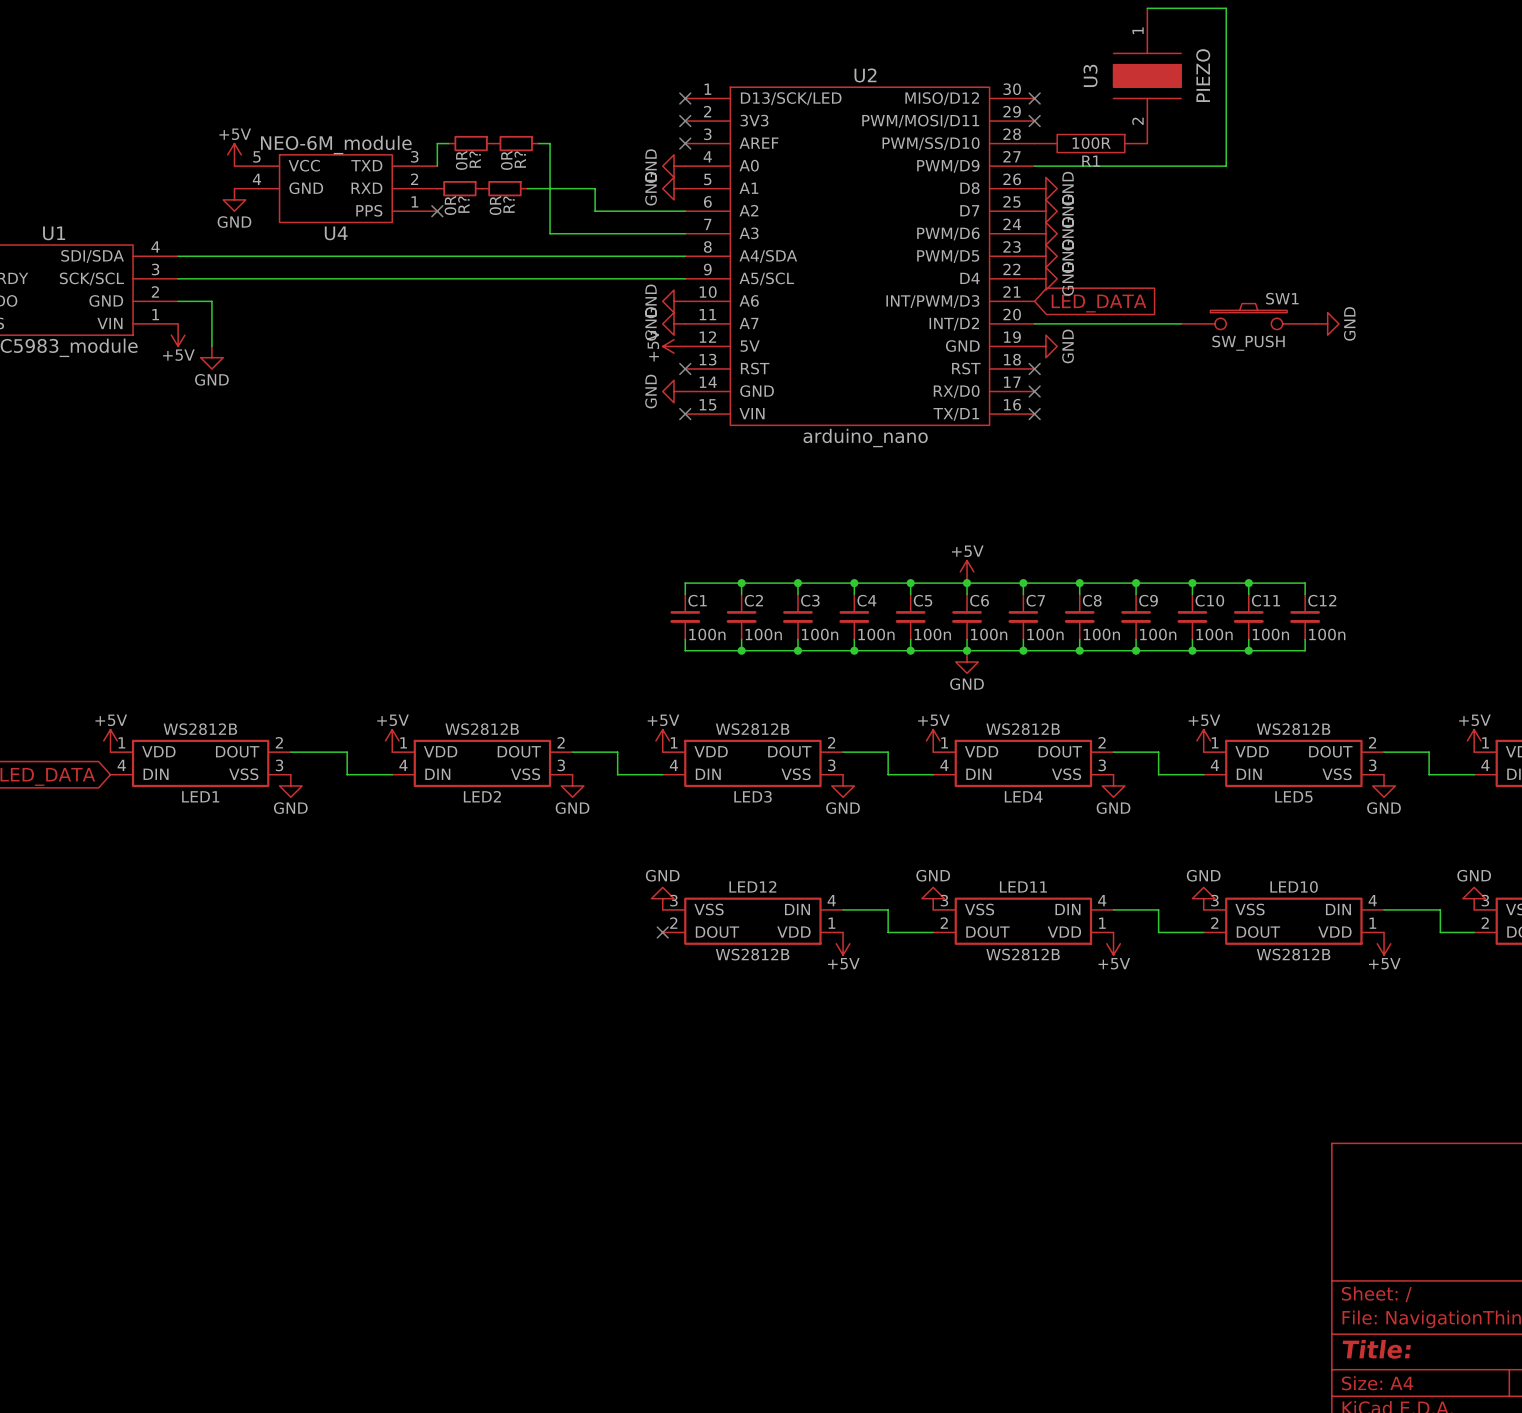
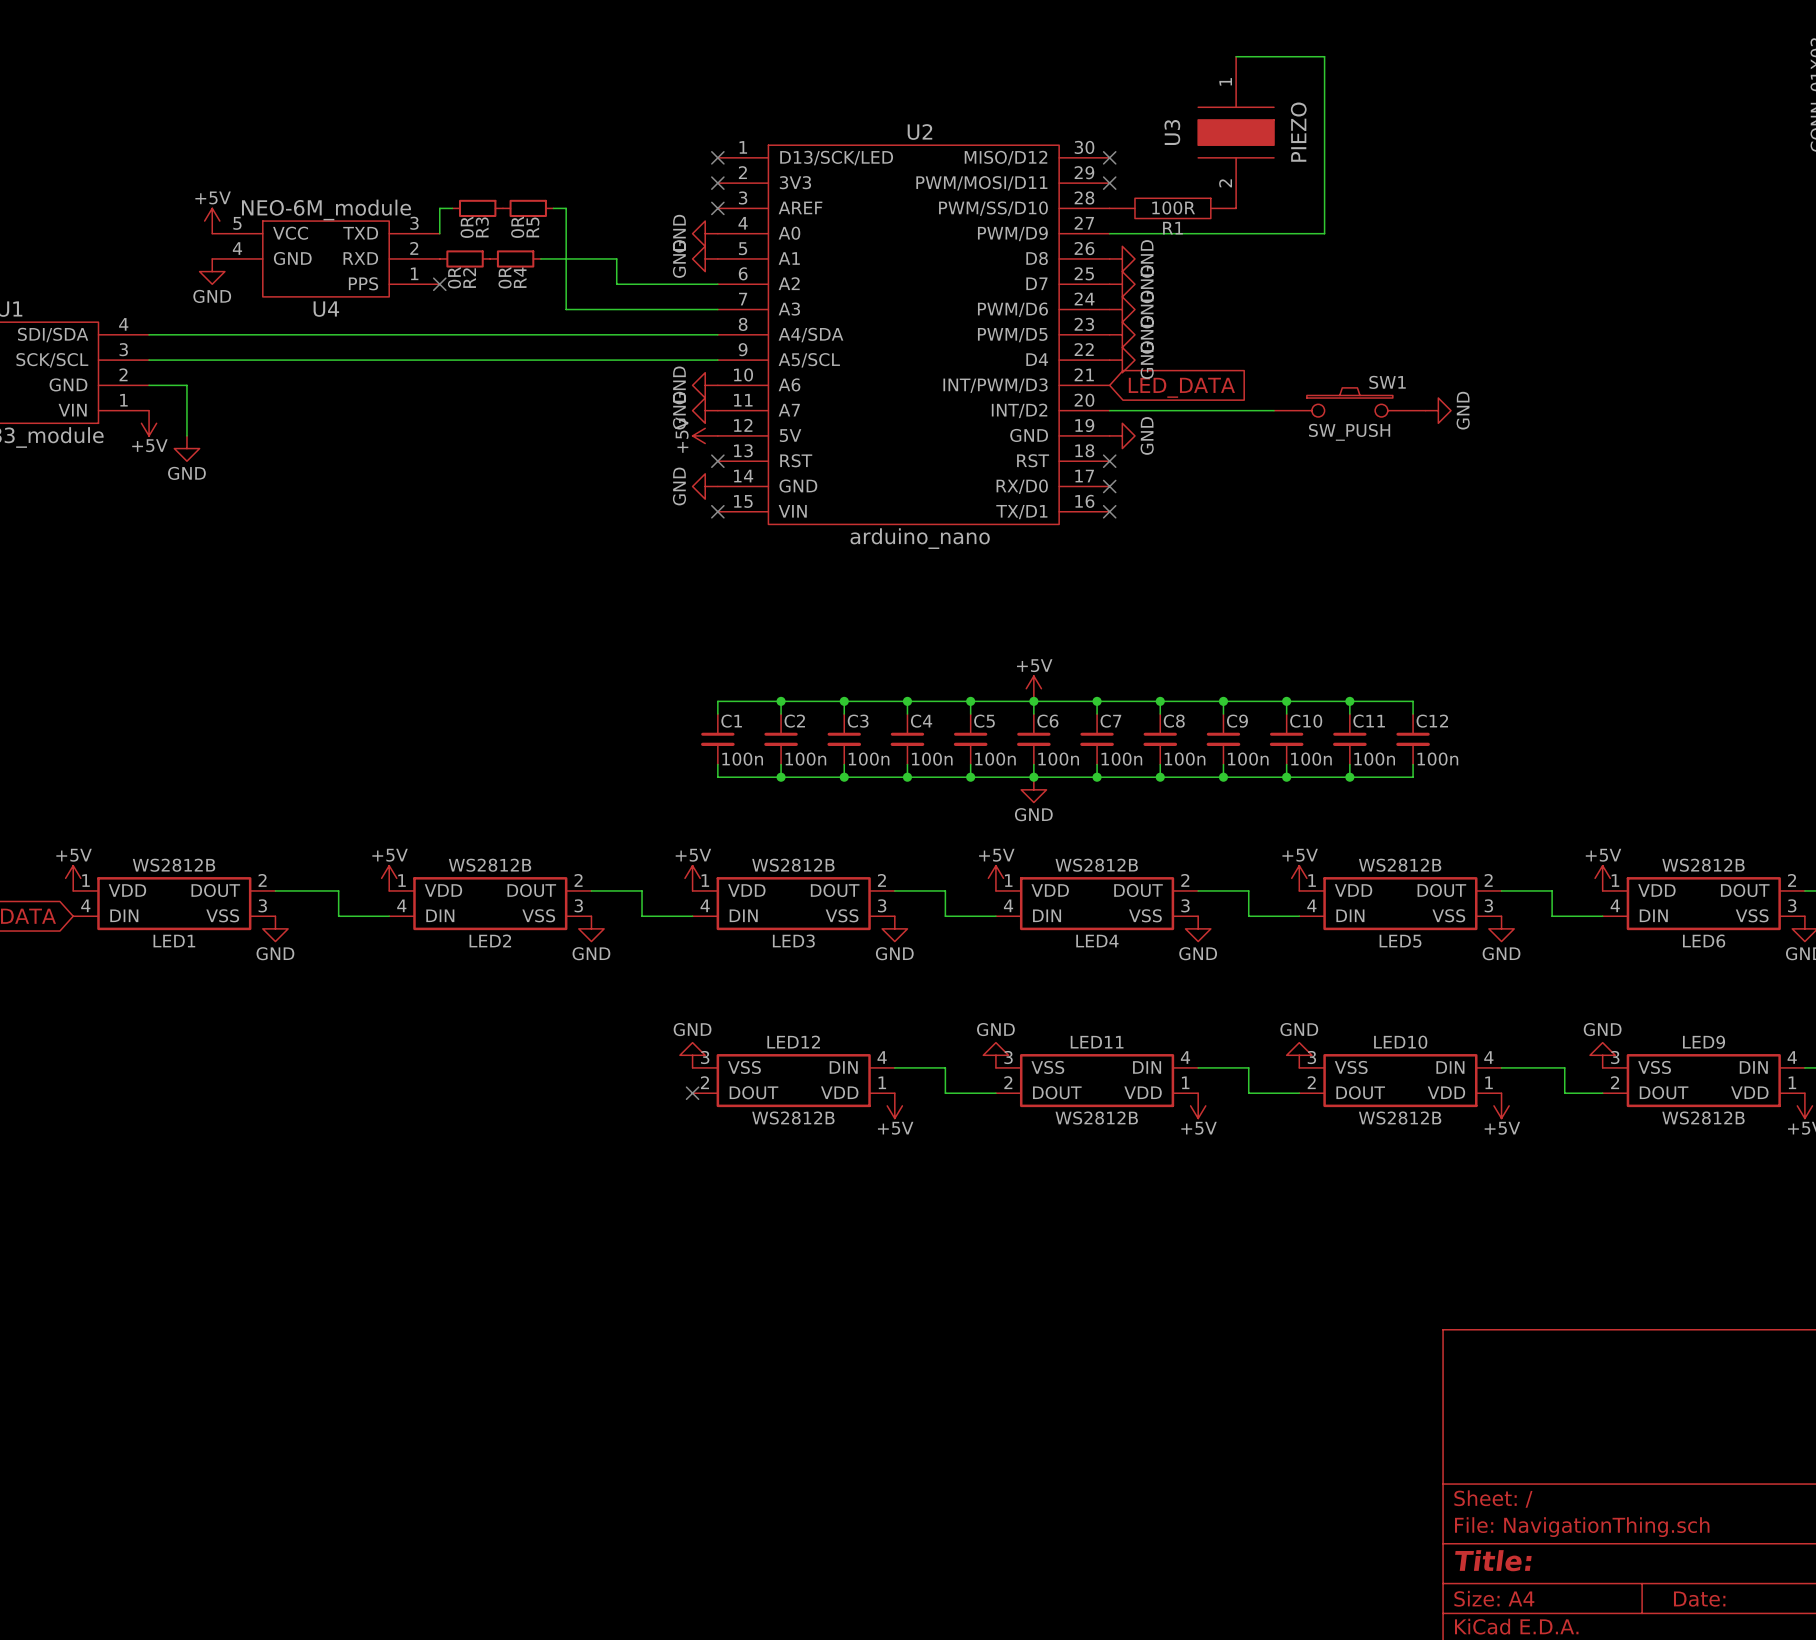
R? name: R? (475, 159) -> R3 (482, 227)
R? name: R? (520, 159) -> R5 (532, 227)
R? name: R? (463, 204) -> R2 (469, 278)
R? name: R? (508, 204) -> R4 (520, 277)

